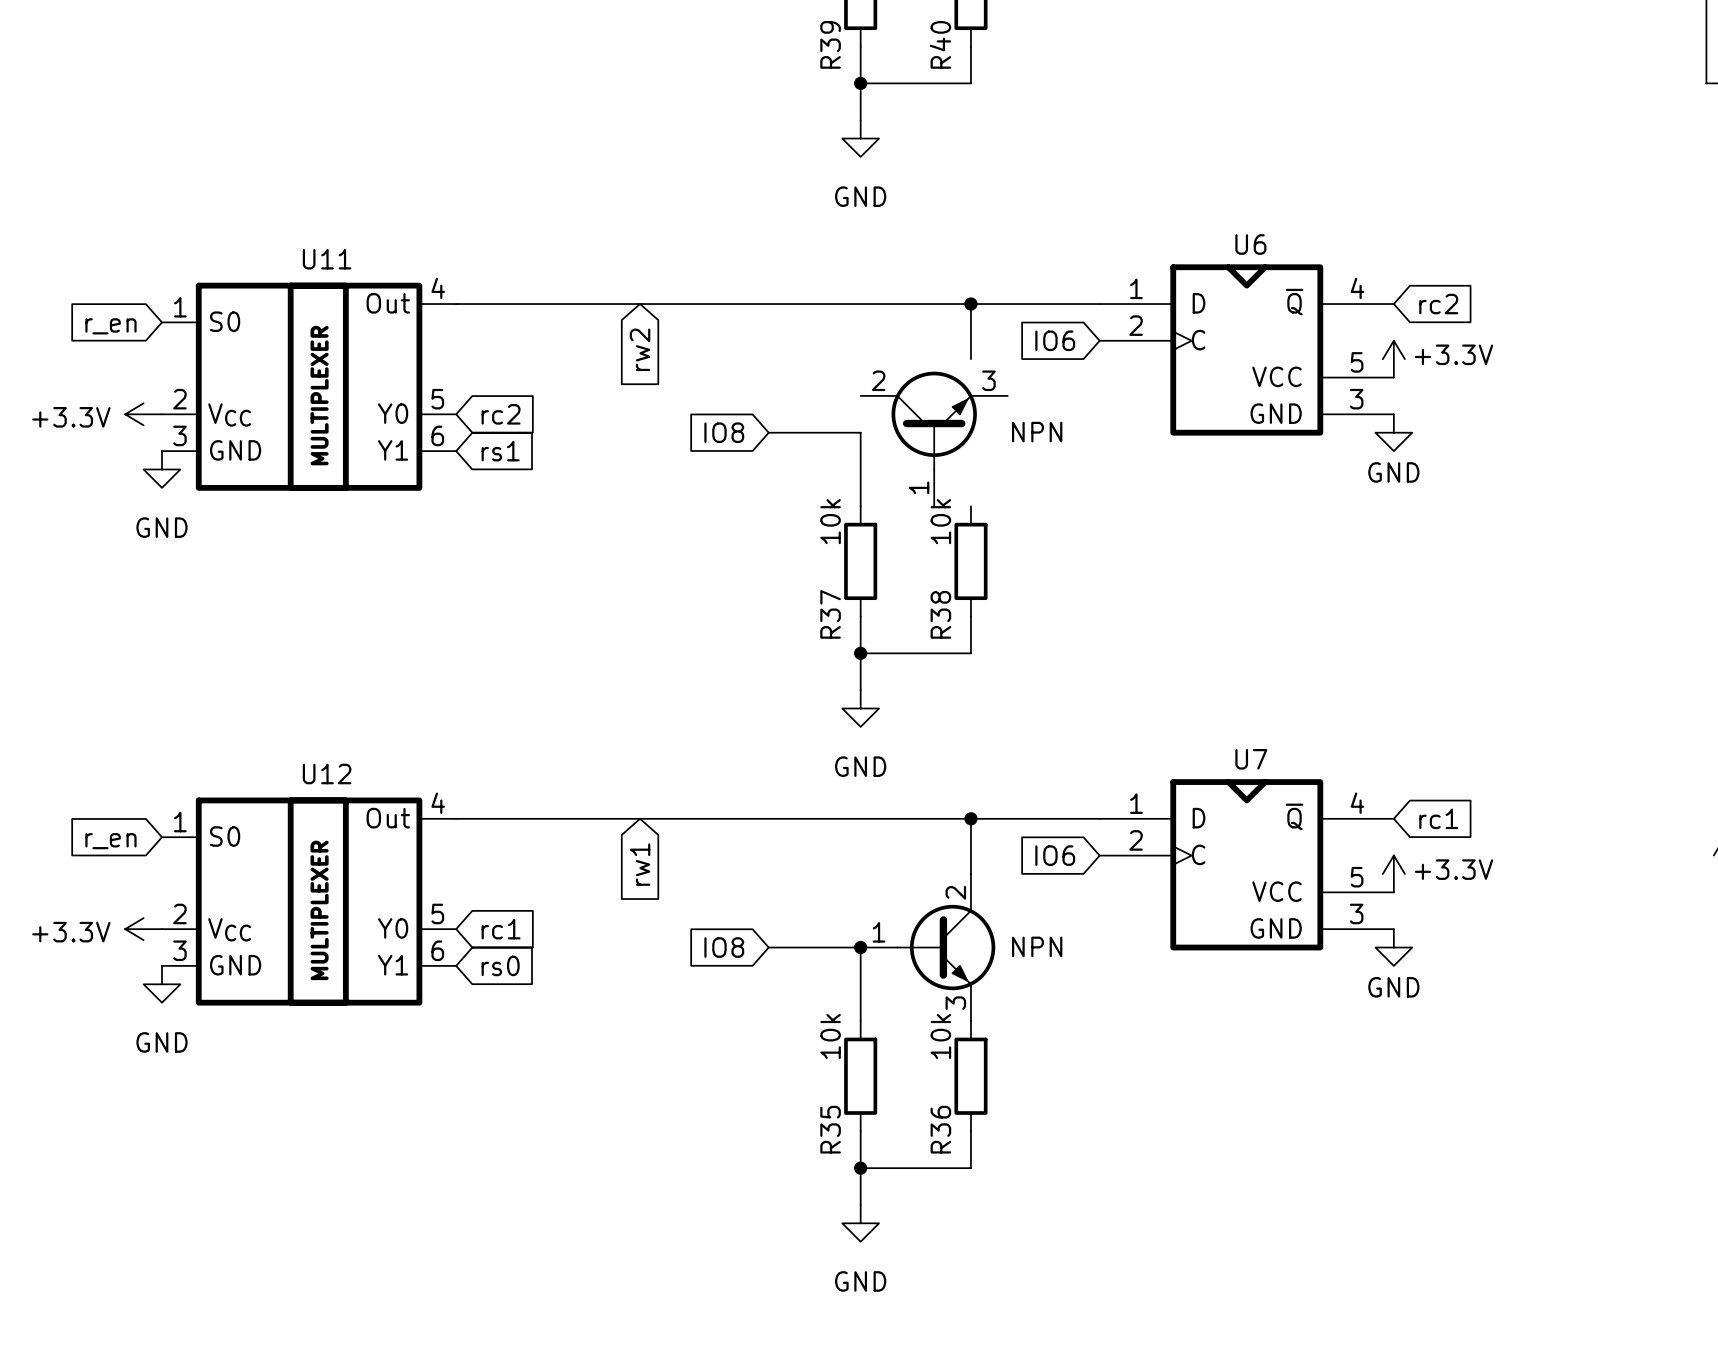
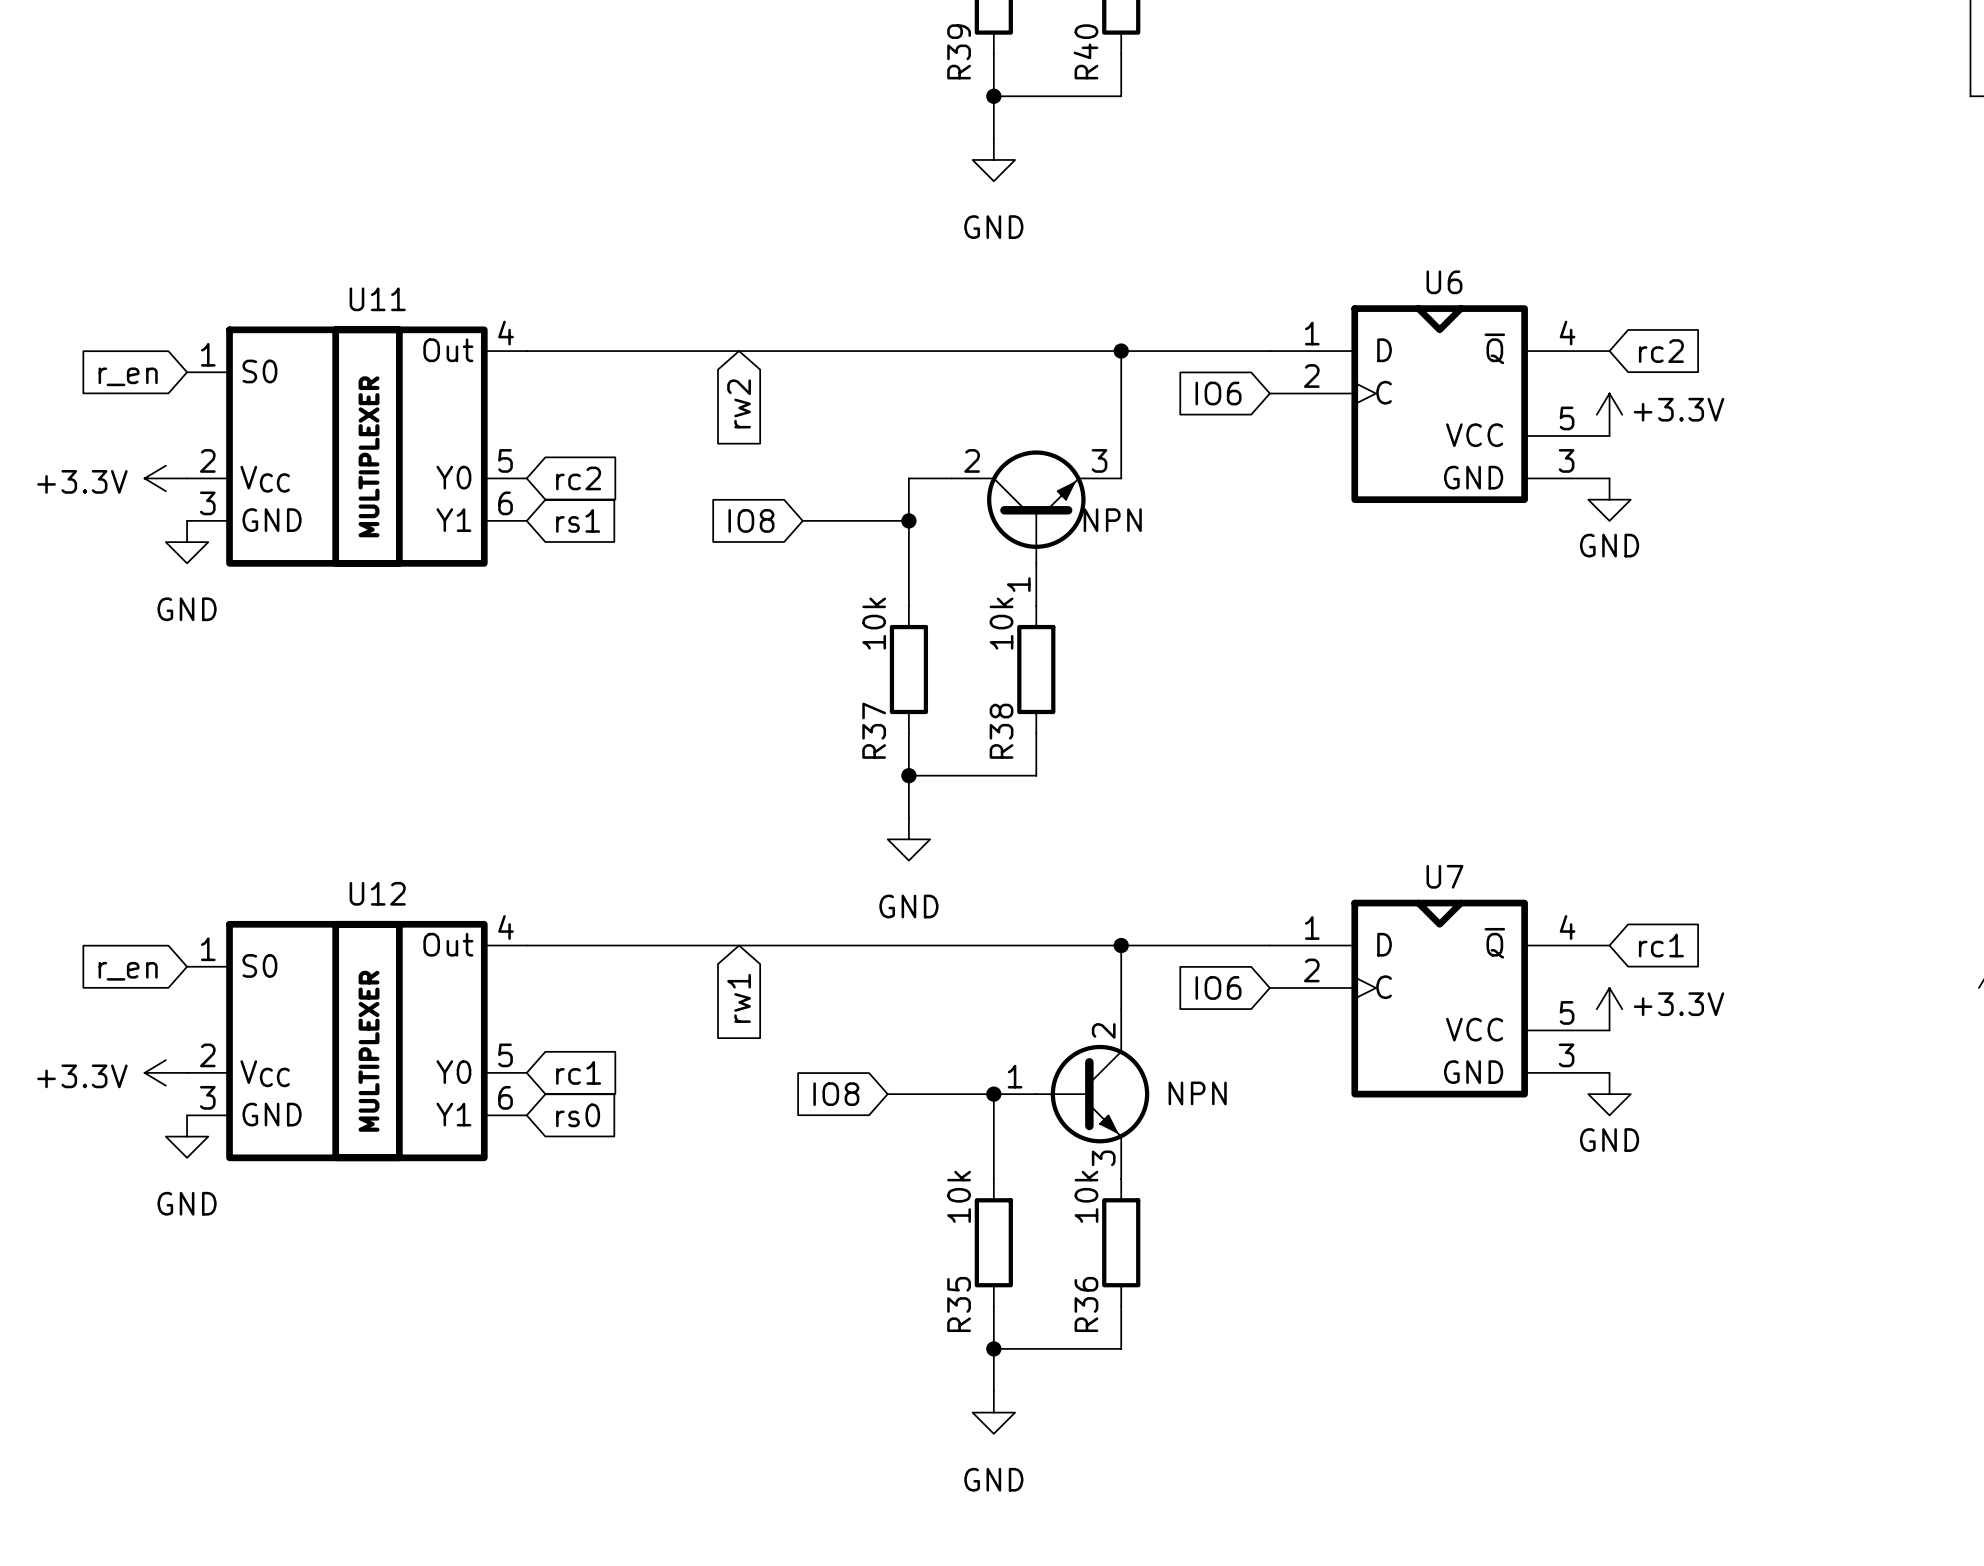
wire: none -> (1121, 414) (1121, 478)
wire: none -> (951, 478) (908, 478) (908, 605)
global label position: IO8 (724, 432) -> IO8 (751, 520)
wire: (768, 432) (860, 432) (860, 506) -> none
text position: NPN (1037, 432) -> NPN (1112, 520)
part position: (934, 438) -> (1036, 528)
wire: none -> (802, 520) (908, 520)
junction: none -> (908, 520)
R37 position: (860, 561) -> (908, 669)
R38 position: (970, 561) -> (1036, 669)
wire: (860, 616) (860, 690) -> (908, 733) (908, 818)
wire: (970, 616) (970, 653) (860, 653) -> (1036, 733) (1036, 775) (908, 775)
junction position: (860, 653) -> (908, 775)
power symbol position: GND (860, 708) -> GND (908, 839)

